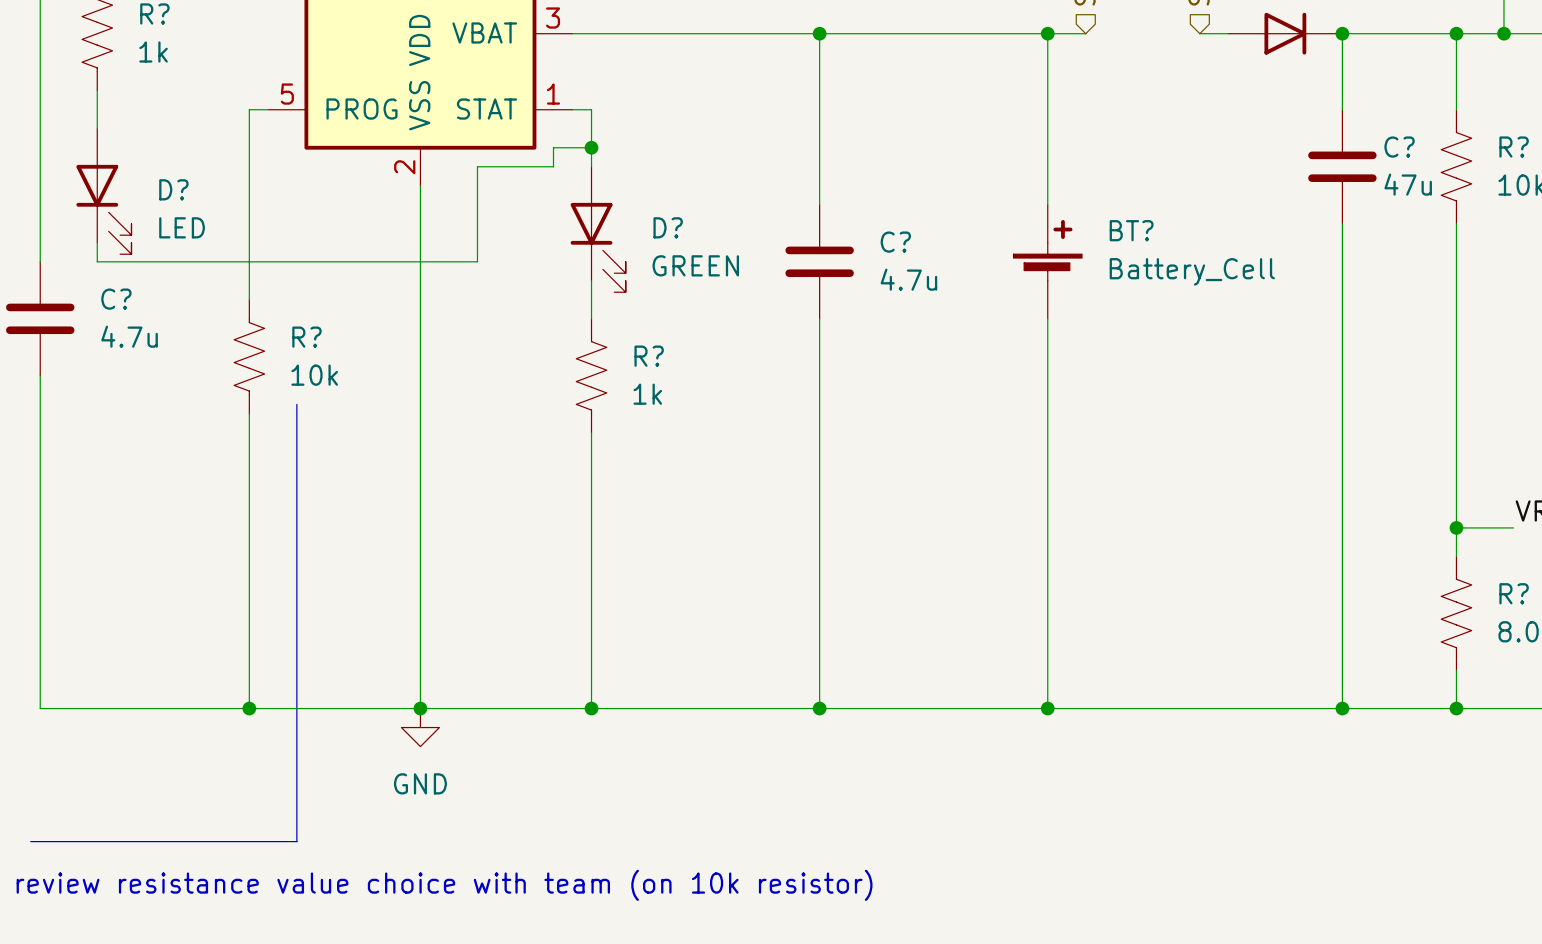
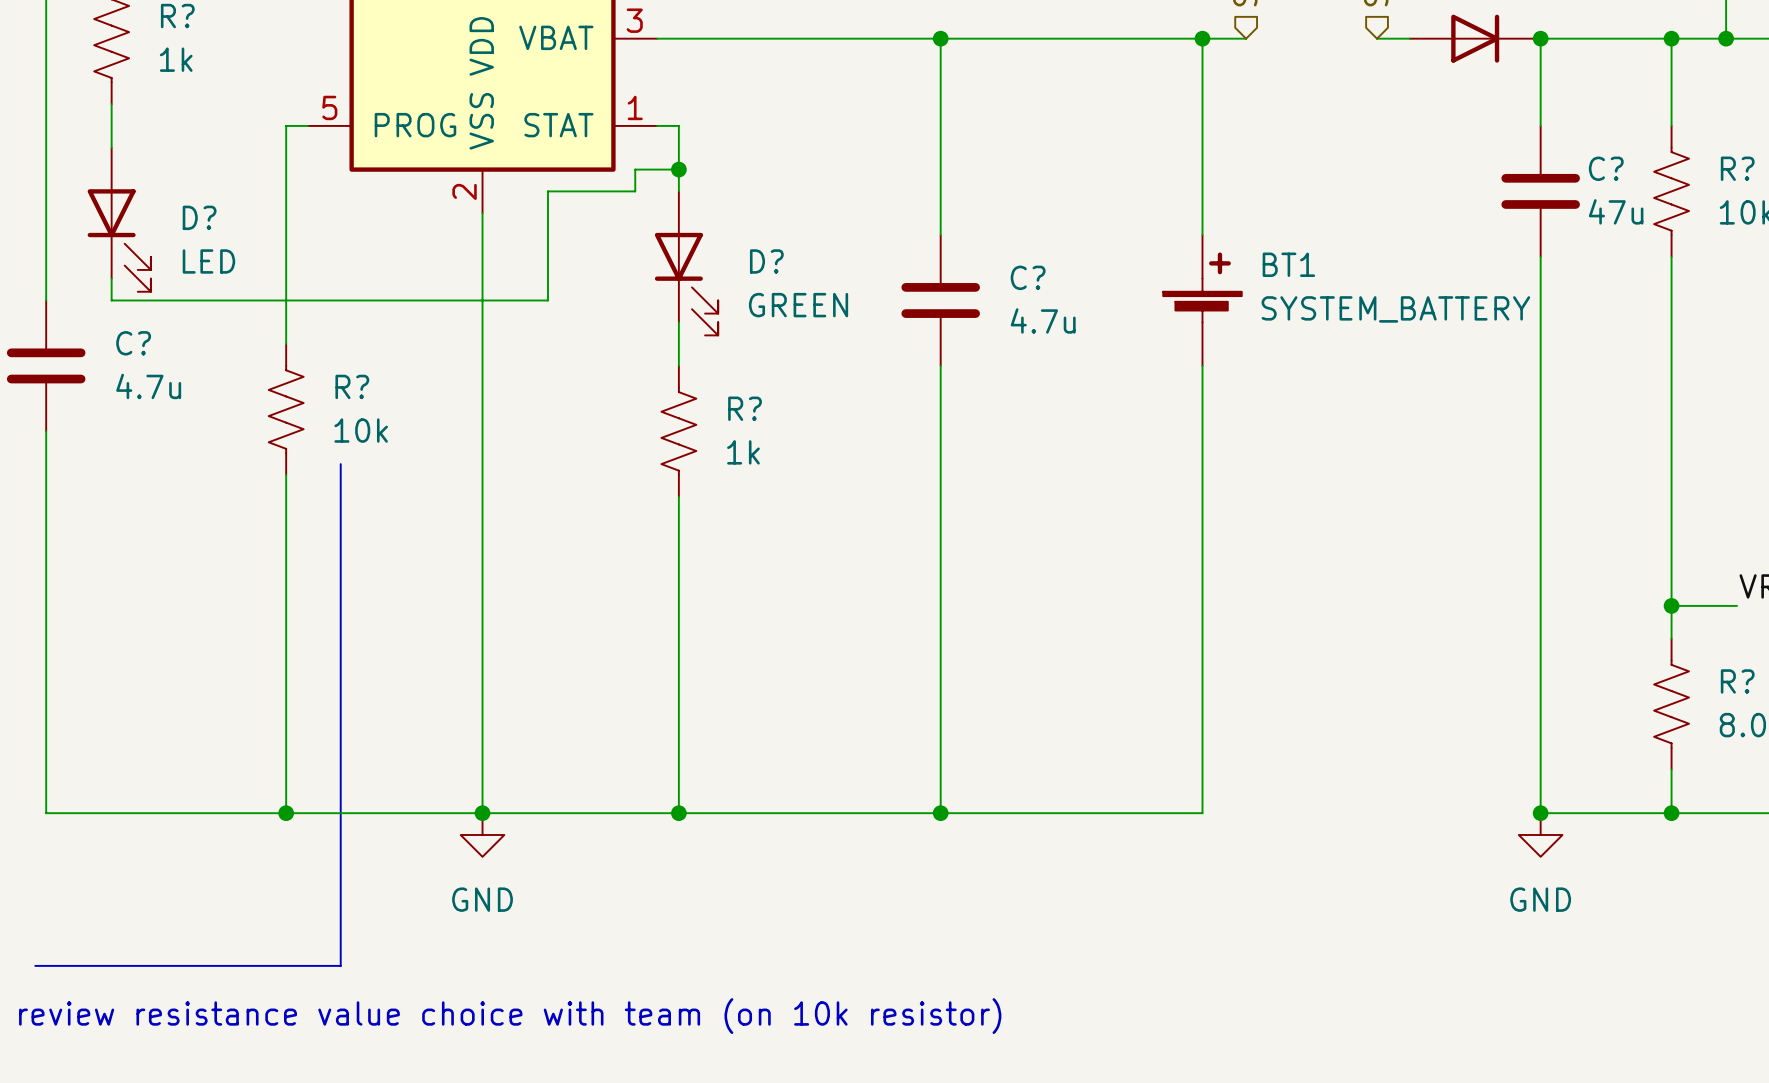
BT? name: BT? (1131, 230) -> BT1 (1288, 264)
BT? value: Battery_Cell (1192, 271) -> SYSTEM_BATTERY (1395, 309)
wire: (1047, 708) (1342, 708) -> none
junction: (1047, 708) -> none
power symbol: none -> GND (1540, 835)

